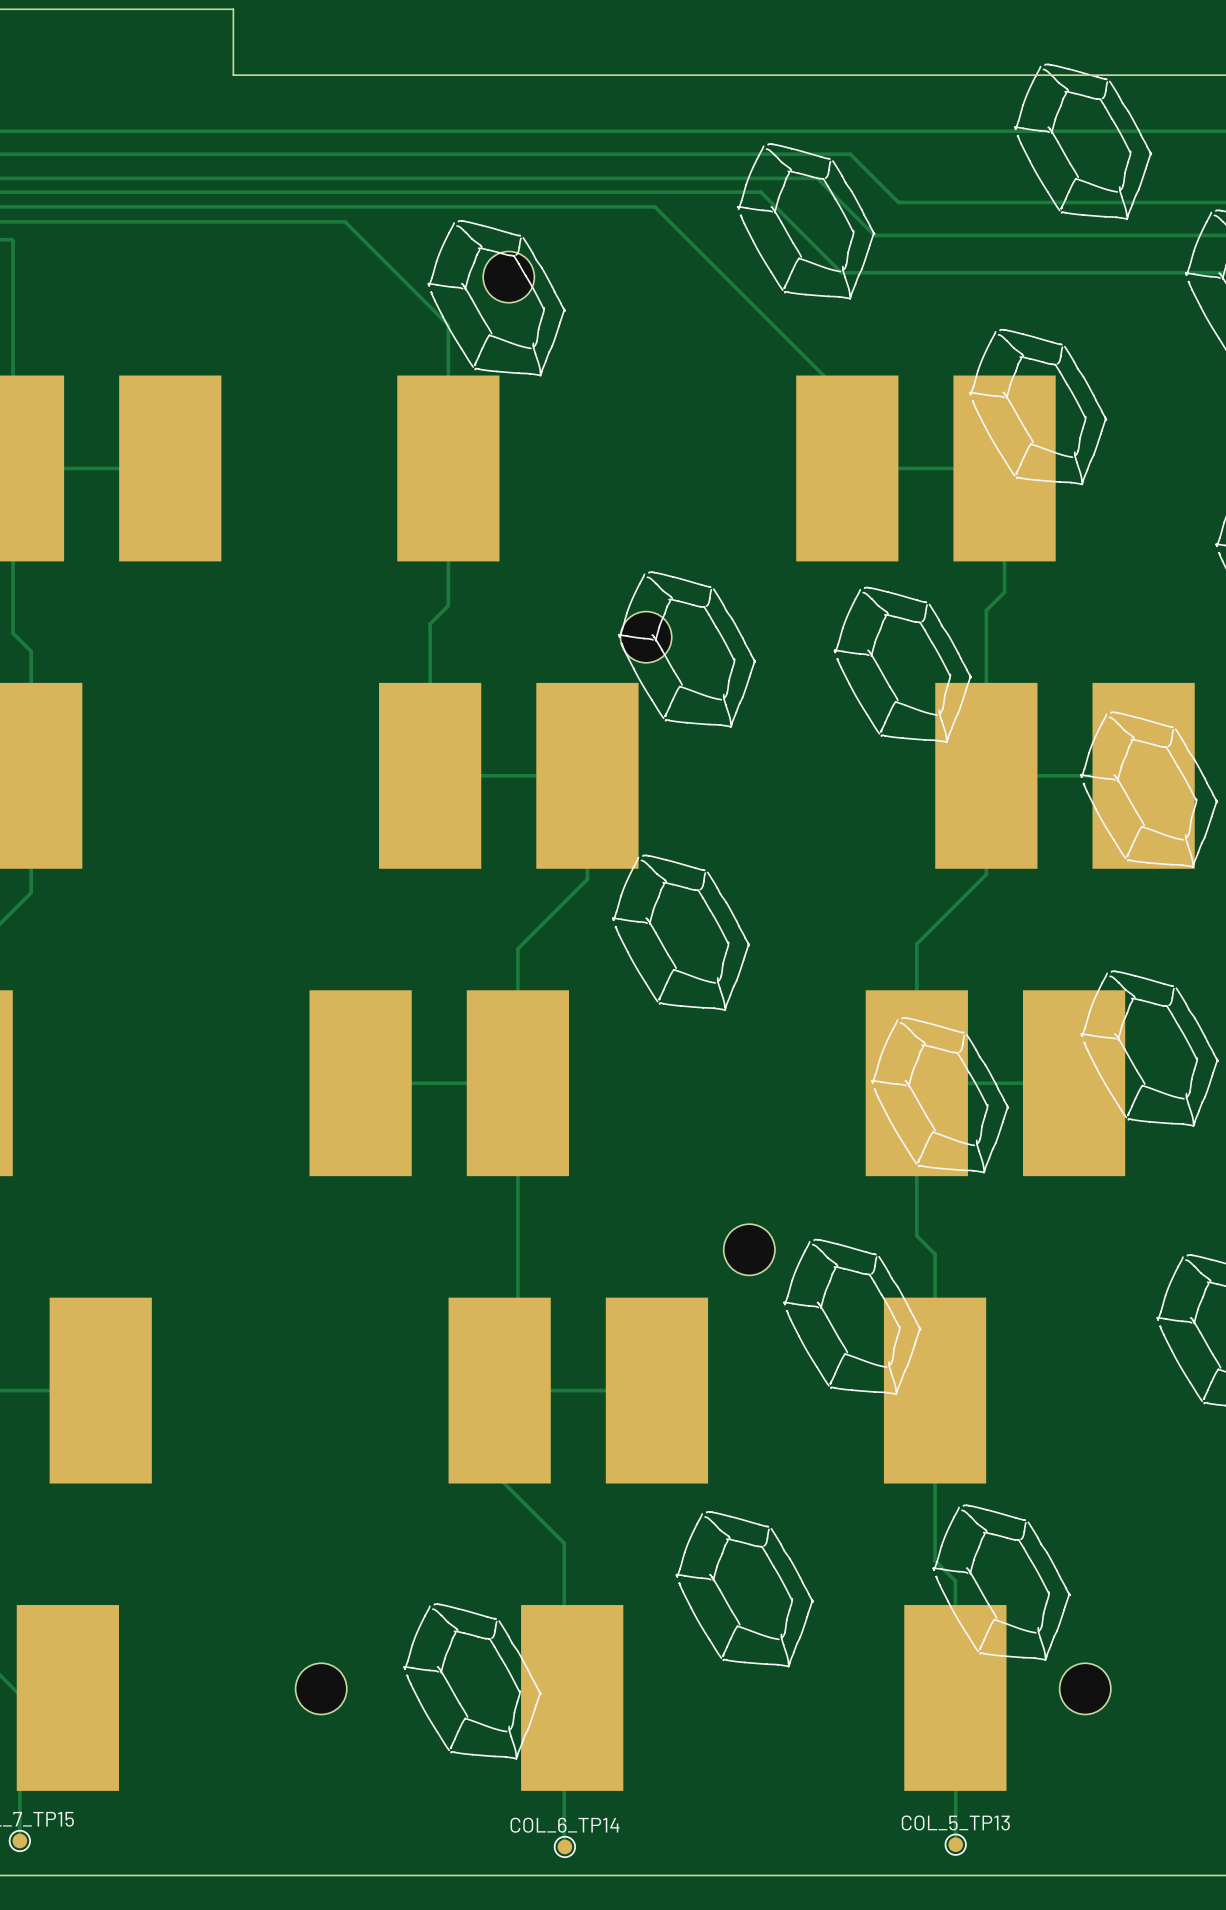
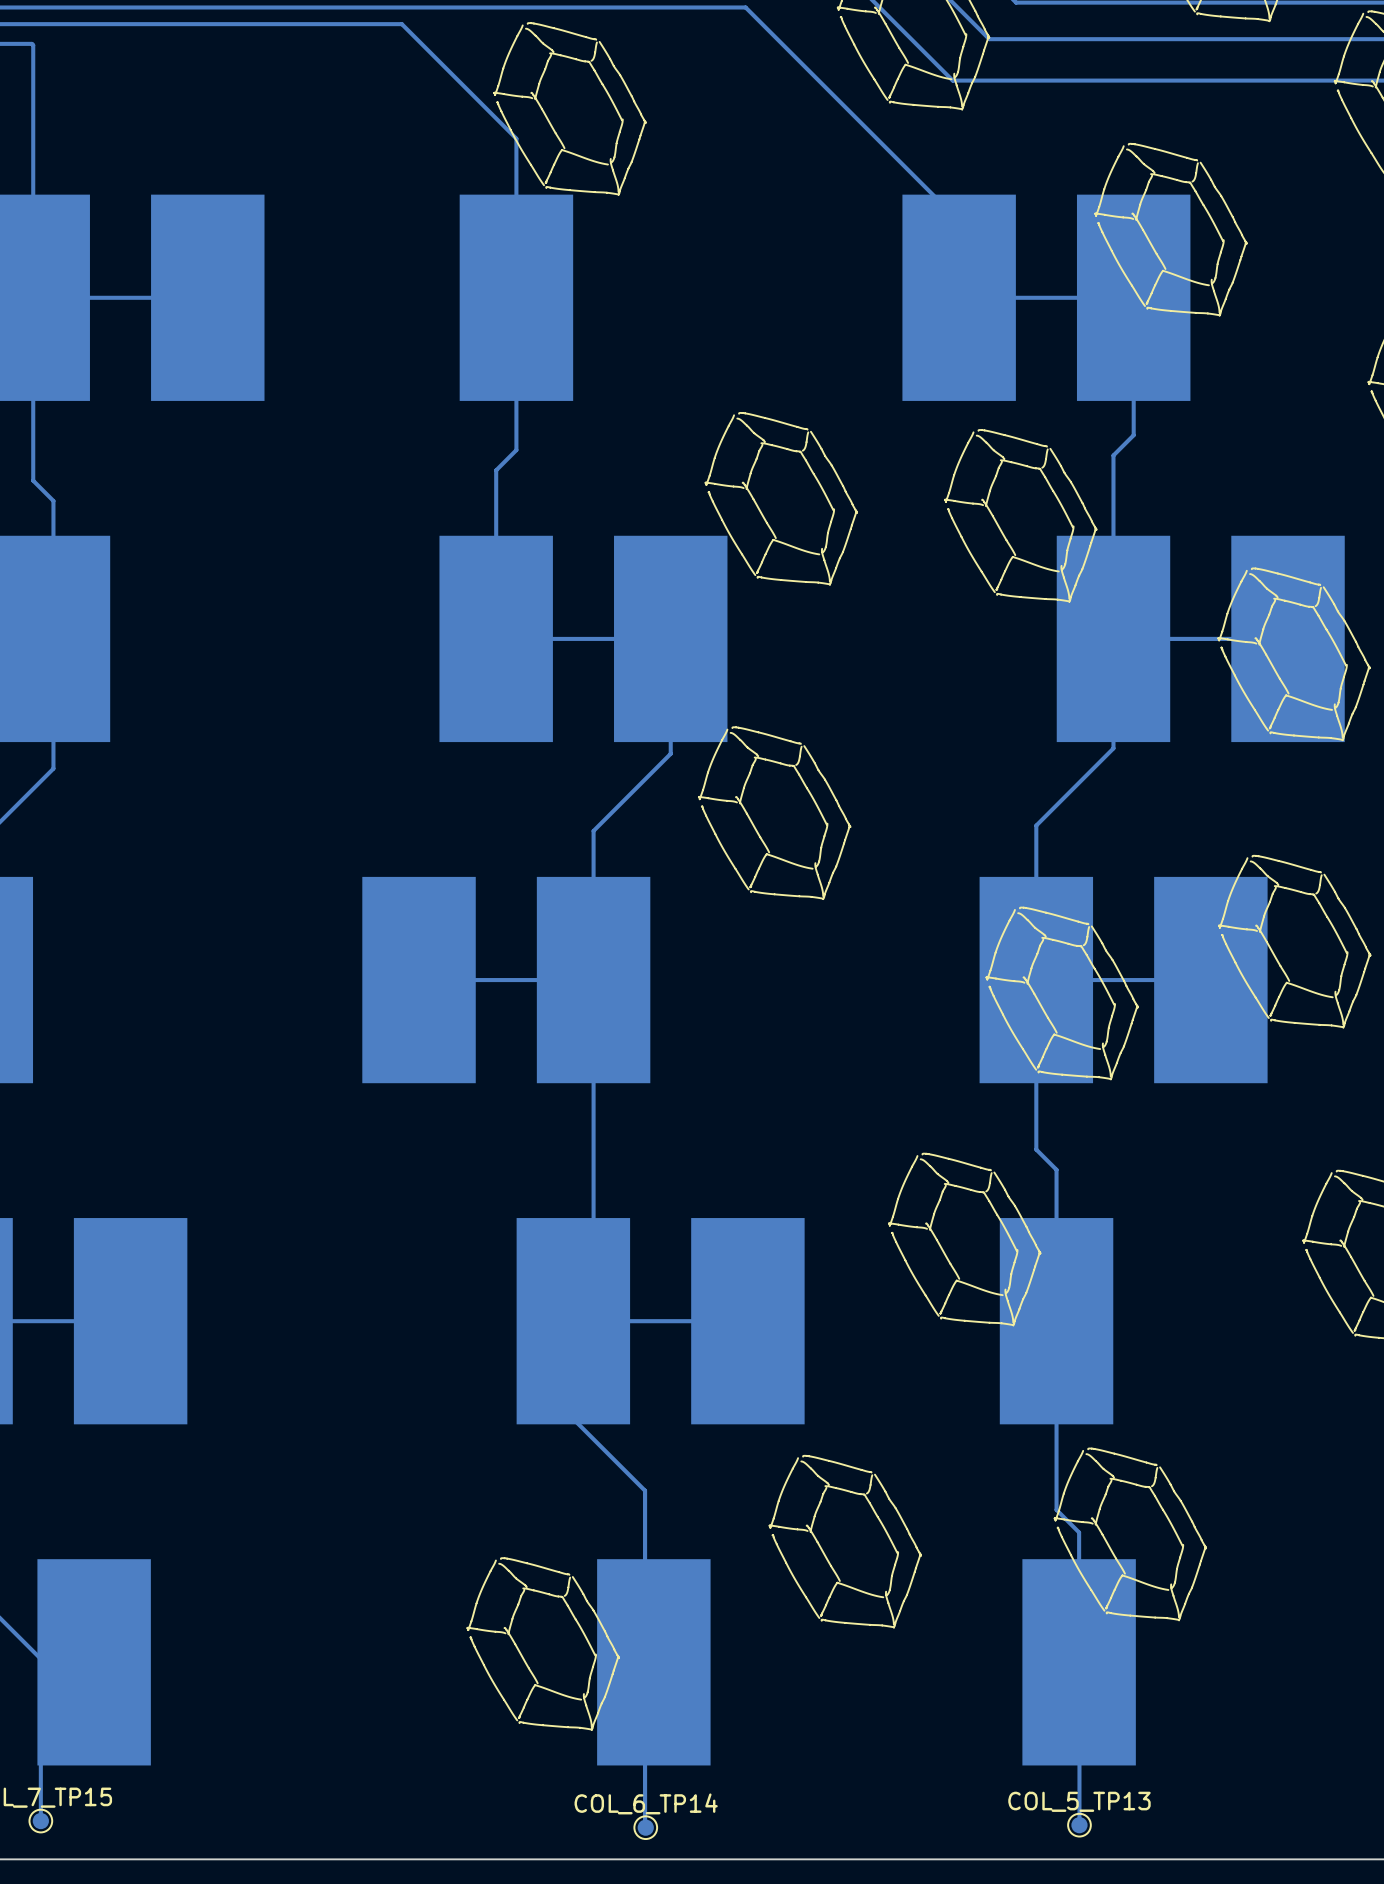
part: (508, 277) -> none
part: (646, 637) -> none
part: (749, 1249) -> none
part: (321, 1688) -> none
part: (1085, 1688) -> none

